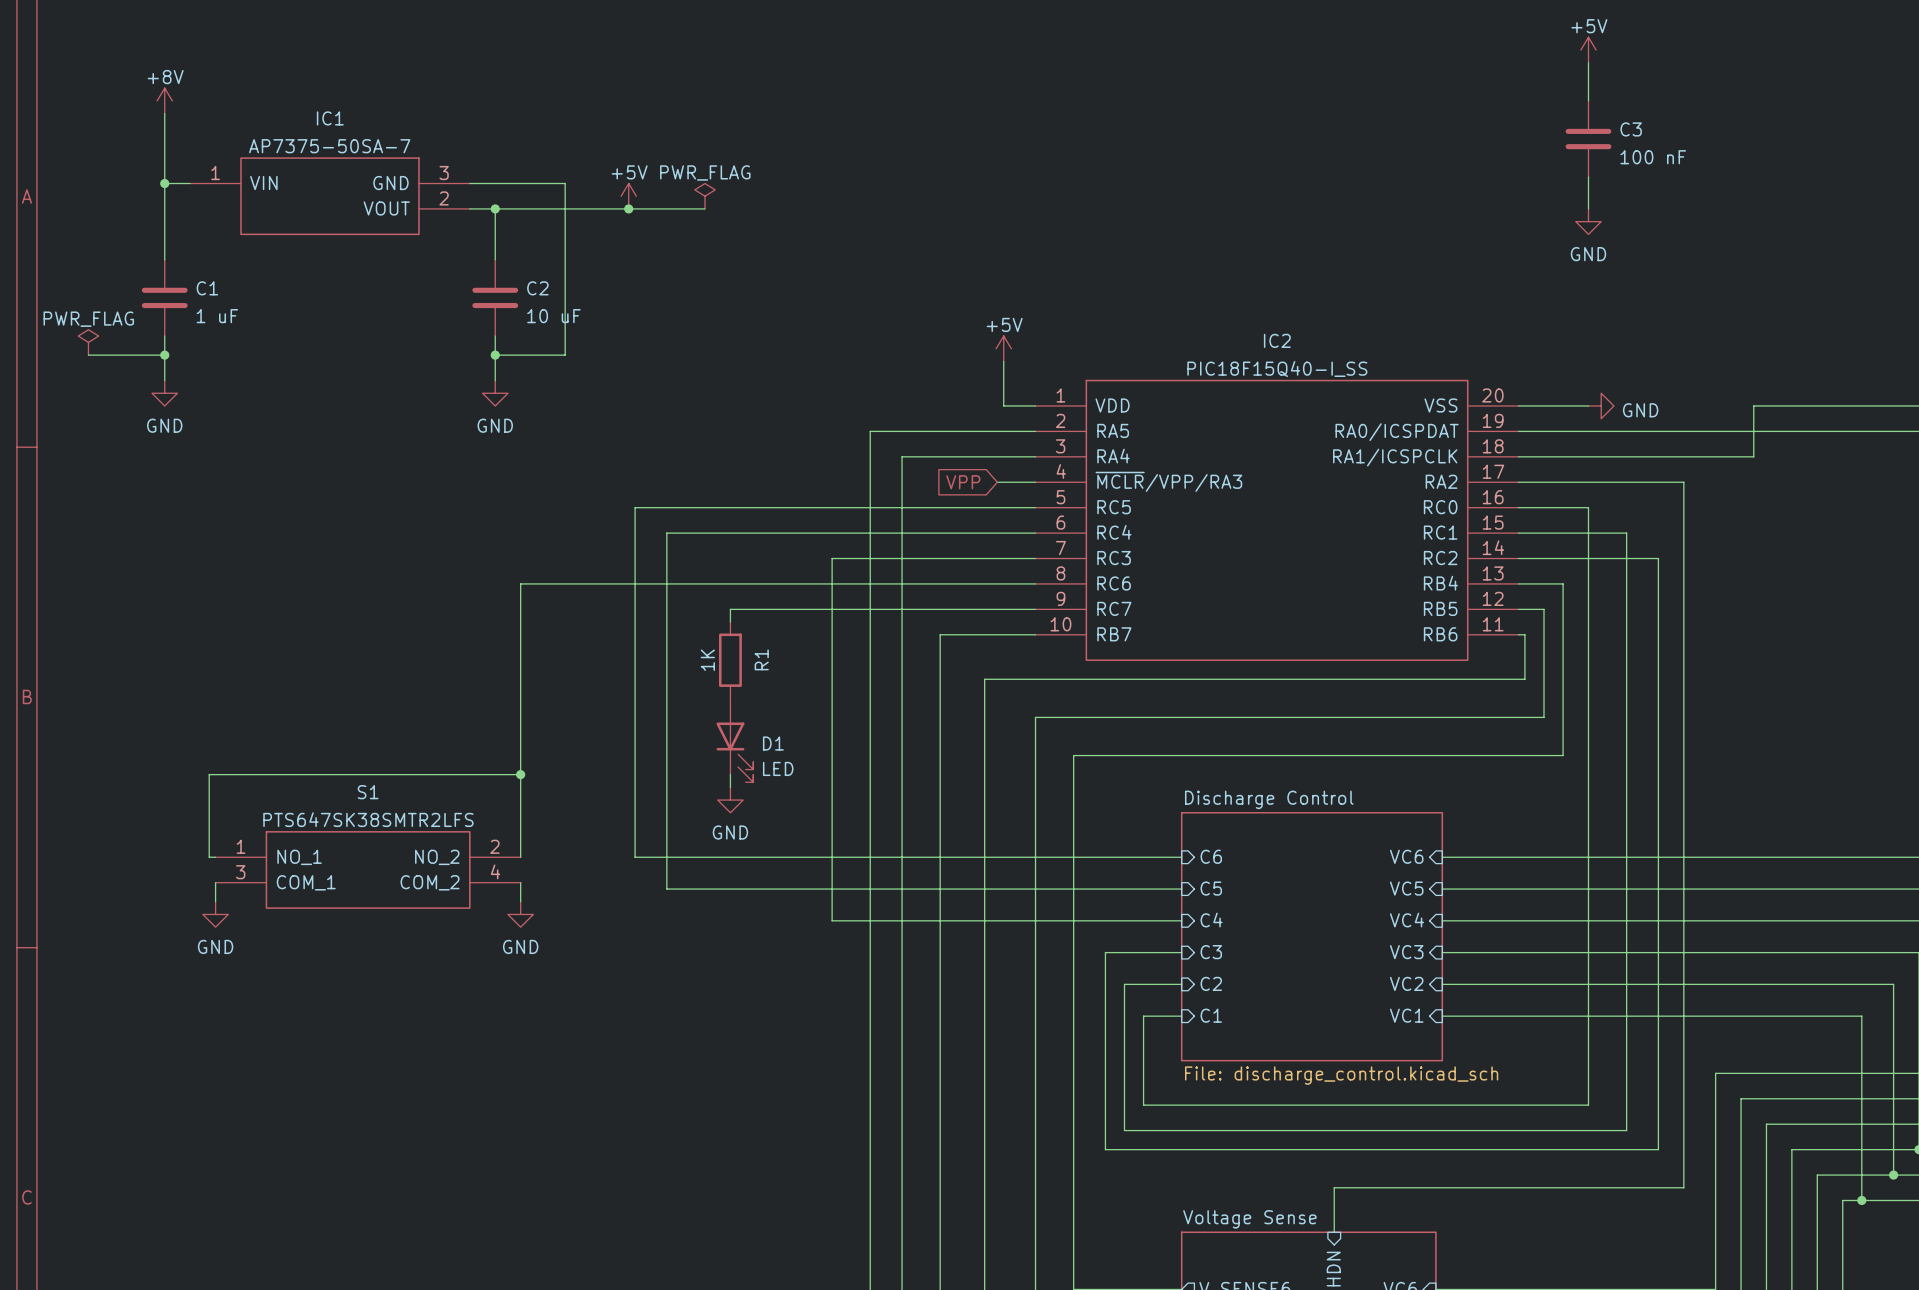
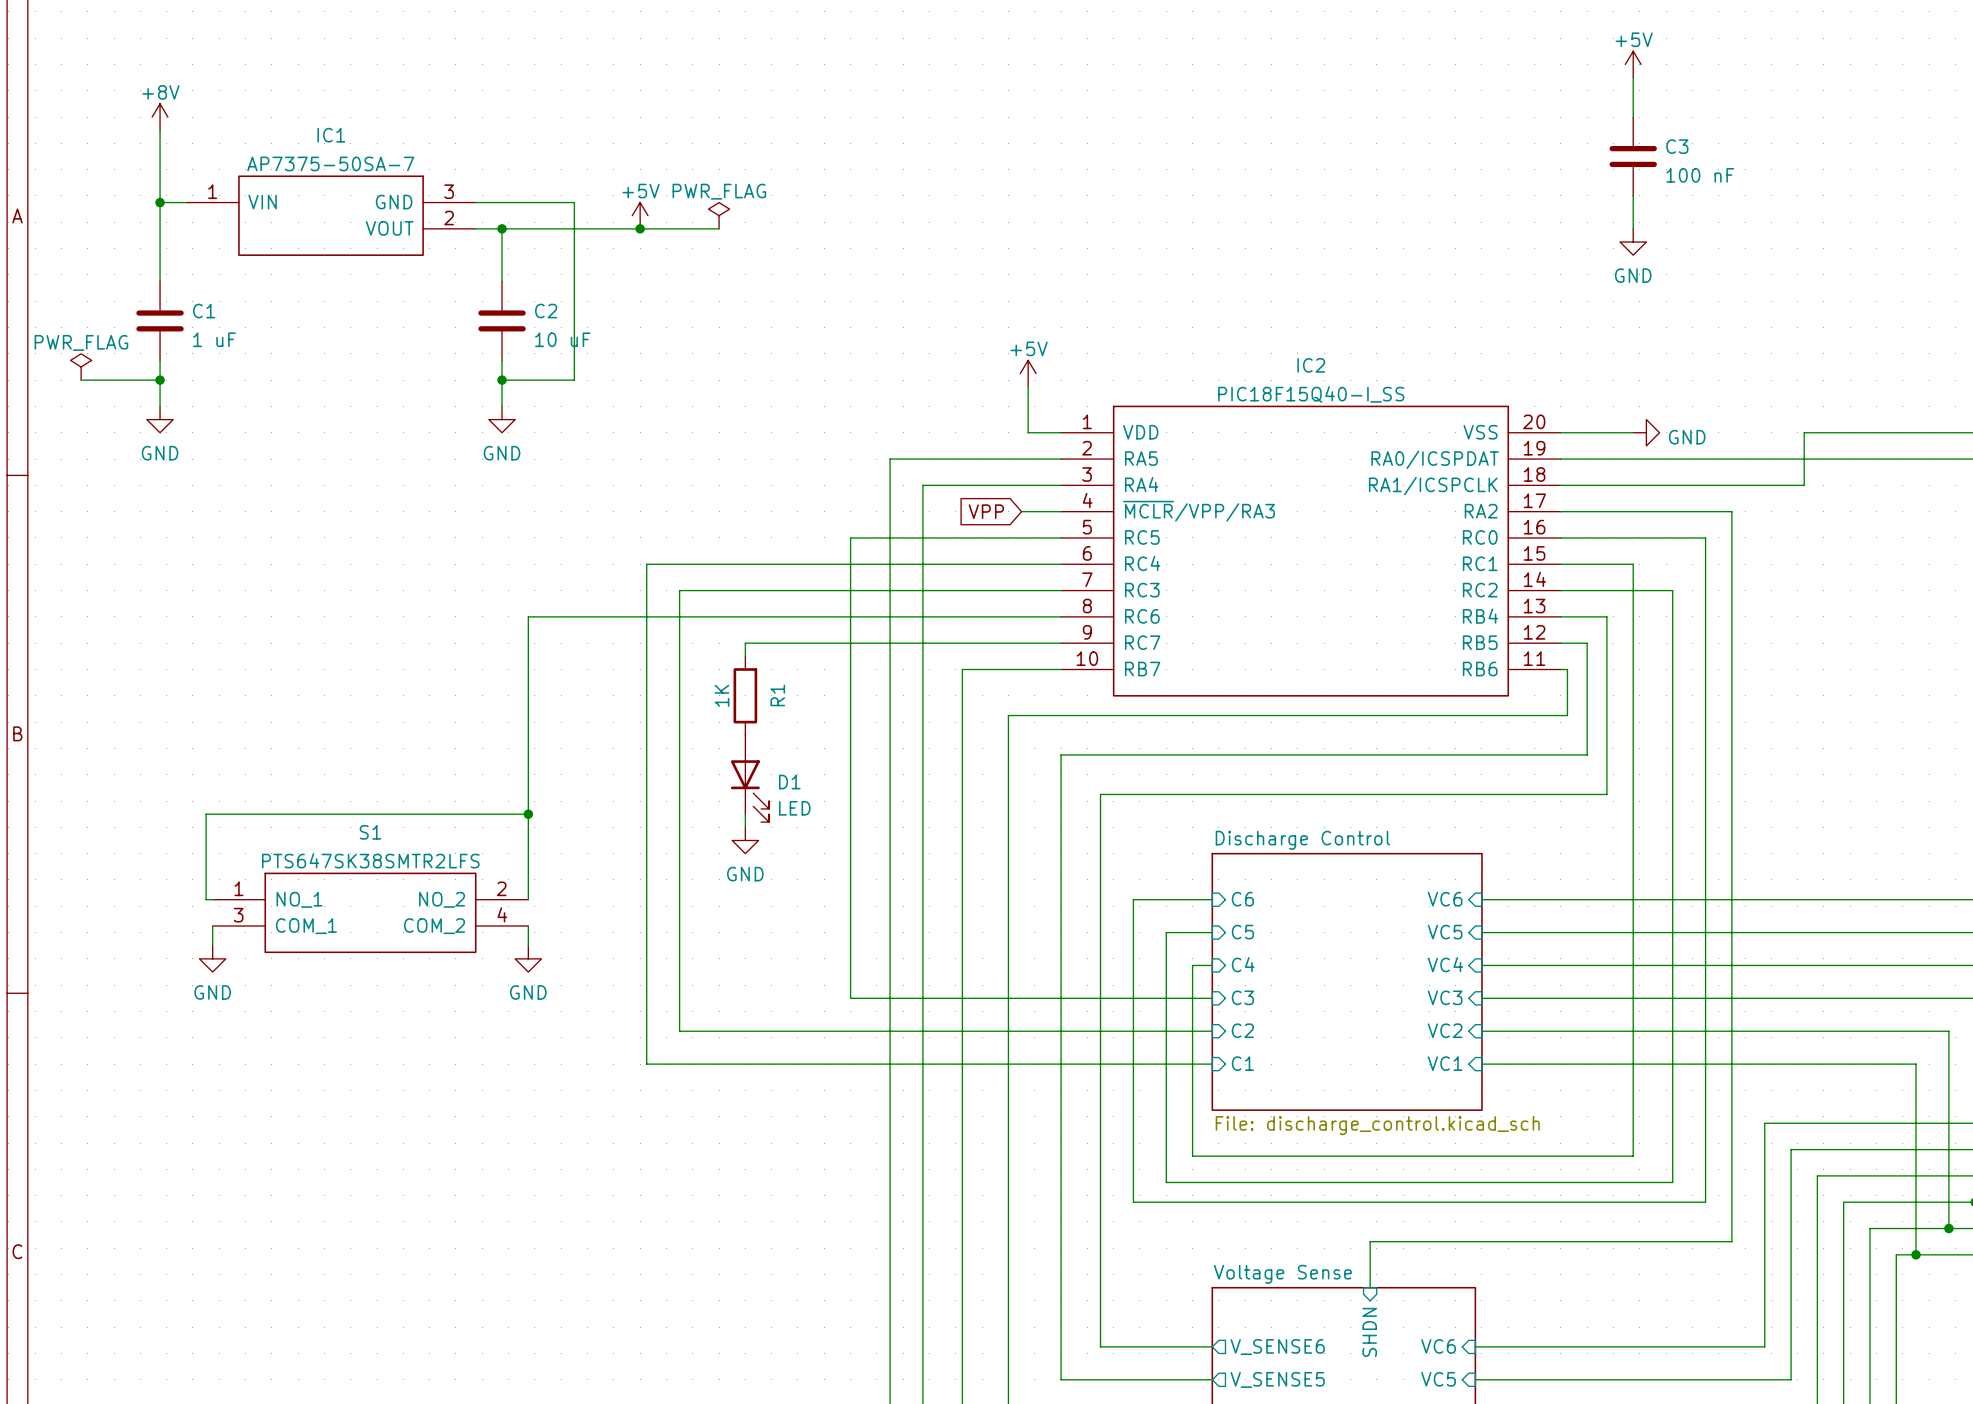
wire: (832, 507) (635, 507) (635, 533) -> (850, 537) (850, 590) (679, 590)
wire: (1588, 507) (1588, 533) (1626, 533) (1626, 558) (1658, 558) -> (1633, 537) (1705, 537) (1705, 590)
wire: (666, 533) (666, 558) -> (679, 564) (646, 564)
wire: (635, 857) (1105, 857) -> (646, 899) (646, 1064) (1172, 1064)
wire: (666, 889) (1137, 889) -> (679, 932) (679, 1031) (1153, 1031)
wire: (832, 920) (1162, 920) -> (850, 965) (850, 998) (1133, 998) (1133, 899)
wire: (1124, 984) (1124, 1130) (1137, 1130) -> (1166, 932) (1166, 1182)
wire: (1143, 1016) (1143, 1105) (1162, 1105) -> (1192, 965) (1192, 1156)

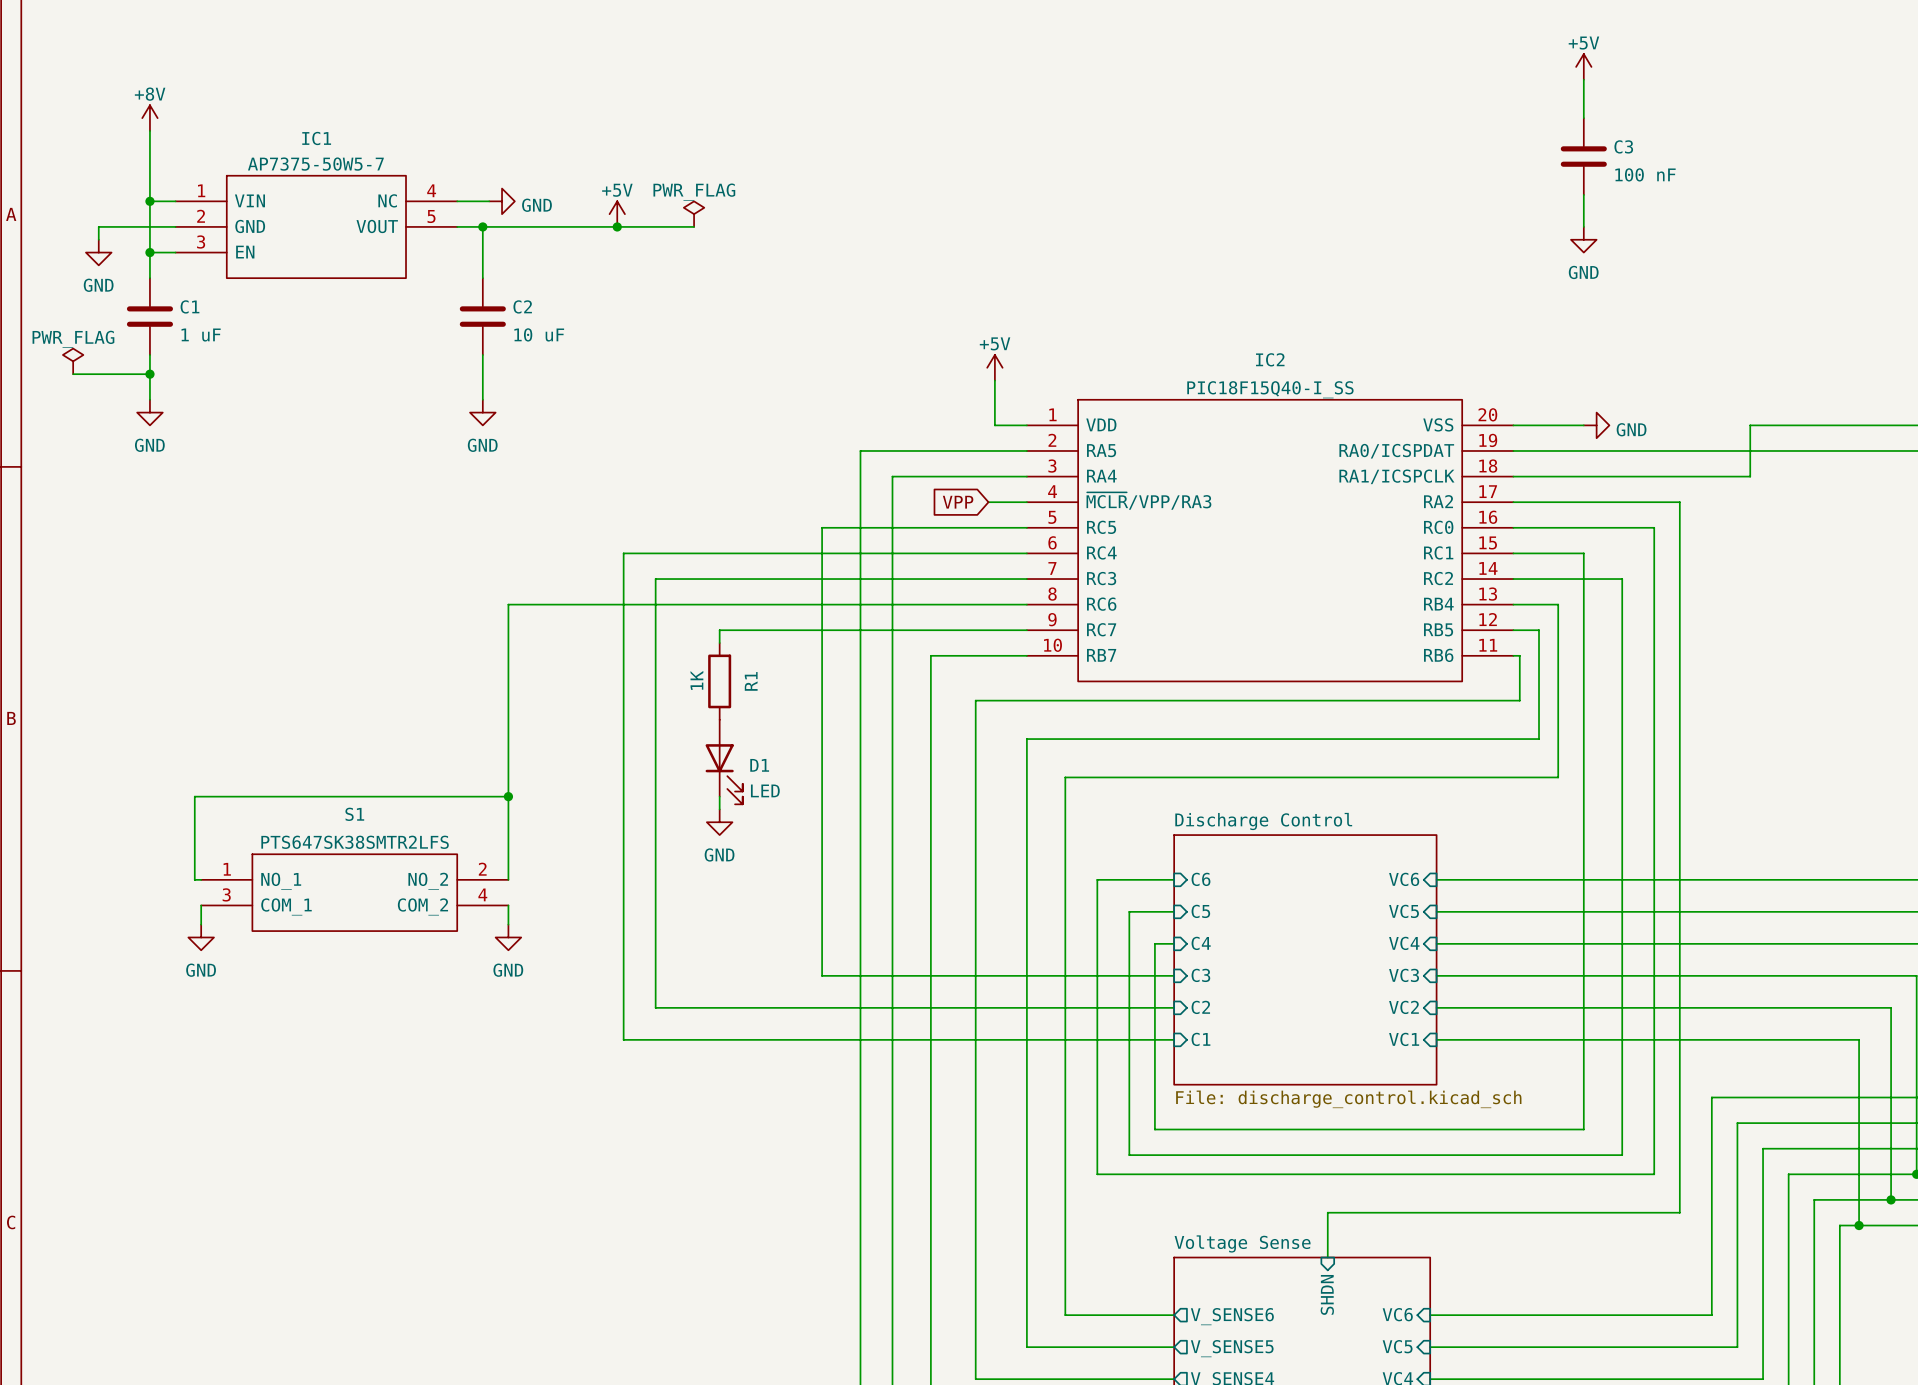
IC1 value: AP7375-50SA-7 (330, 163) -> AP7375-50W5-7 (315, 164)
IC1 symbol: [186, 175, 476, 256] -> [175, 174, 458, 279]
wire: (508, 202) (574, 202) (574, 380) (502, 380) -> none
power symbol: none -> GND (502, 201)
wire: none -> (175, 226) (98, 226) (98, 239)
power symbol: none -> GND (98, 252)
wire: none -> (149, 252) (175, 252)
junction: none -> (149, 252)
junction: (502, 380) -> none

